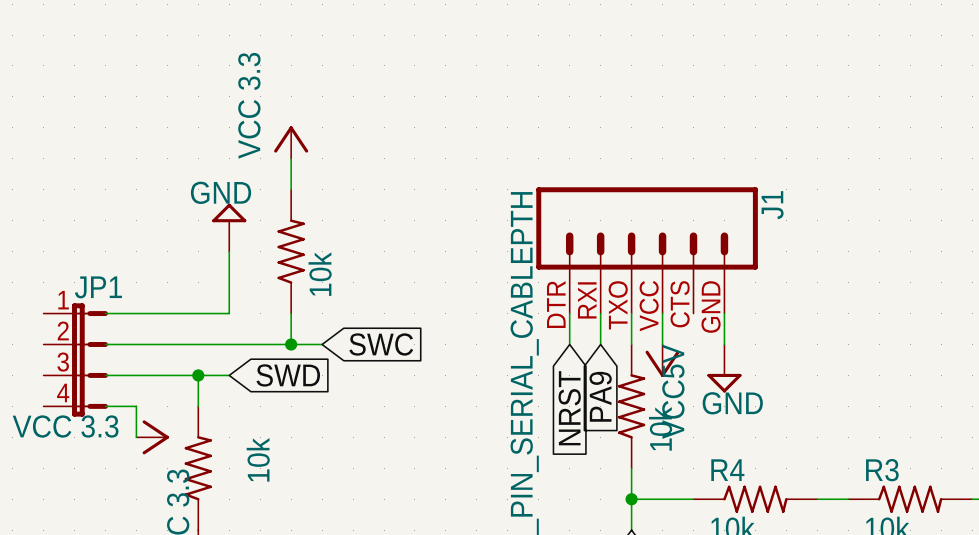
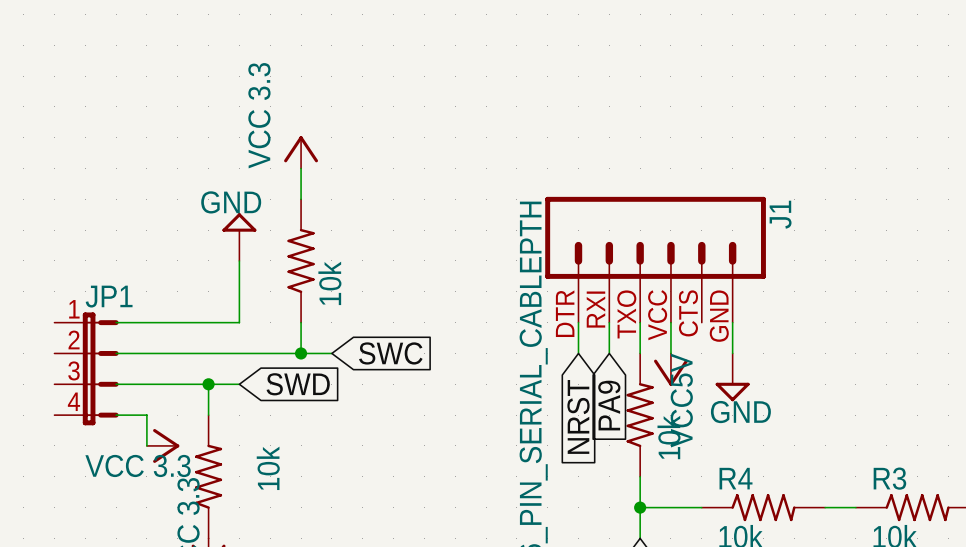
power symbol text position: VCC 3.3 (65, 426) -> VCC 3.3 (138, 465)

